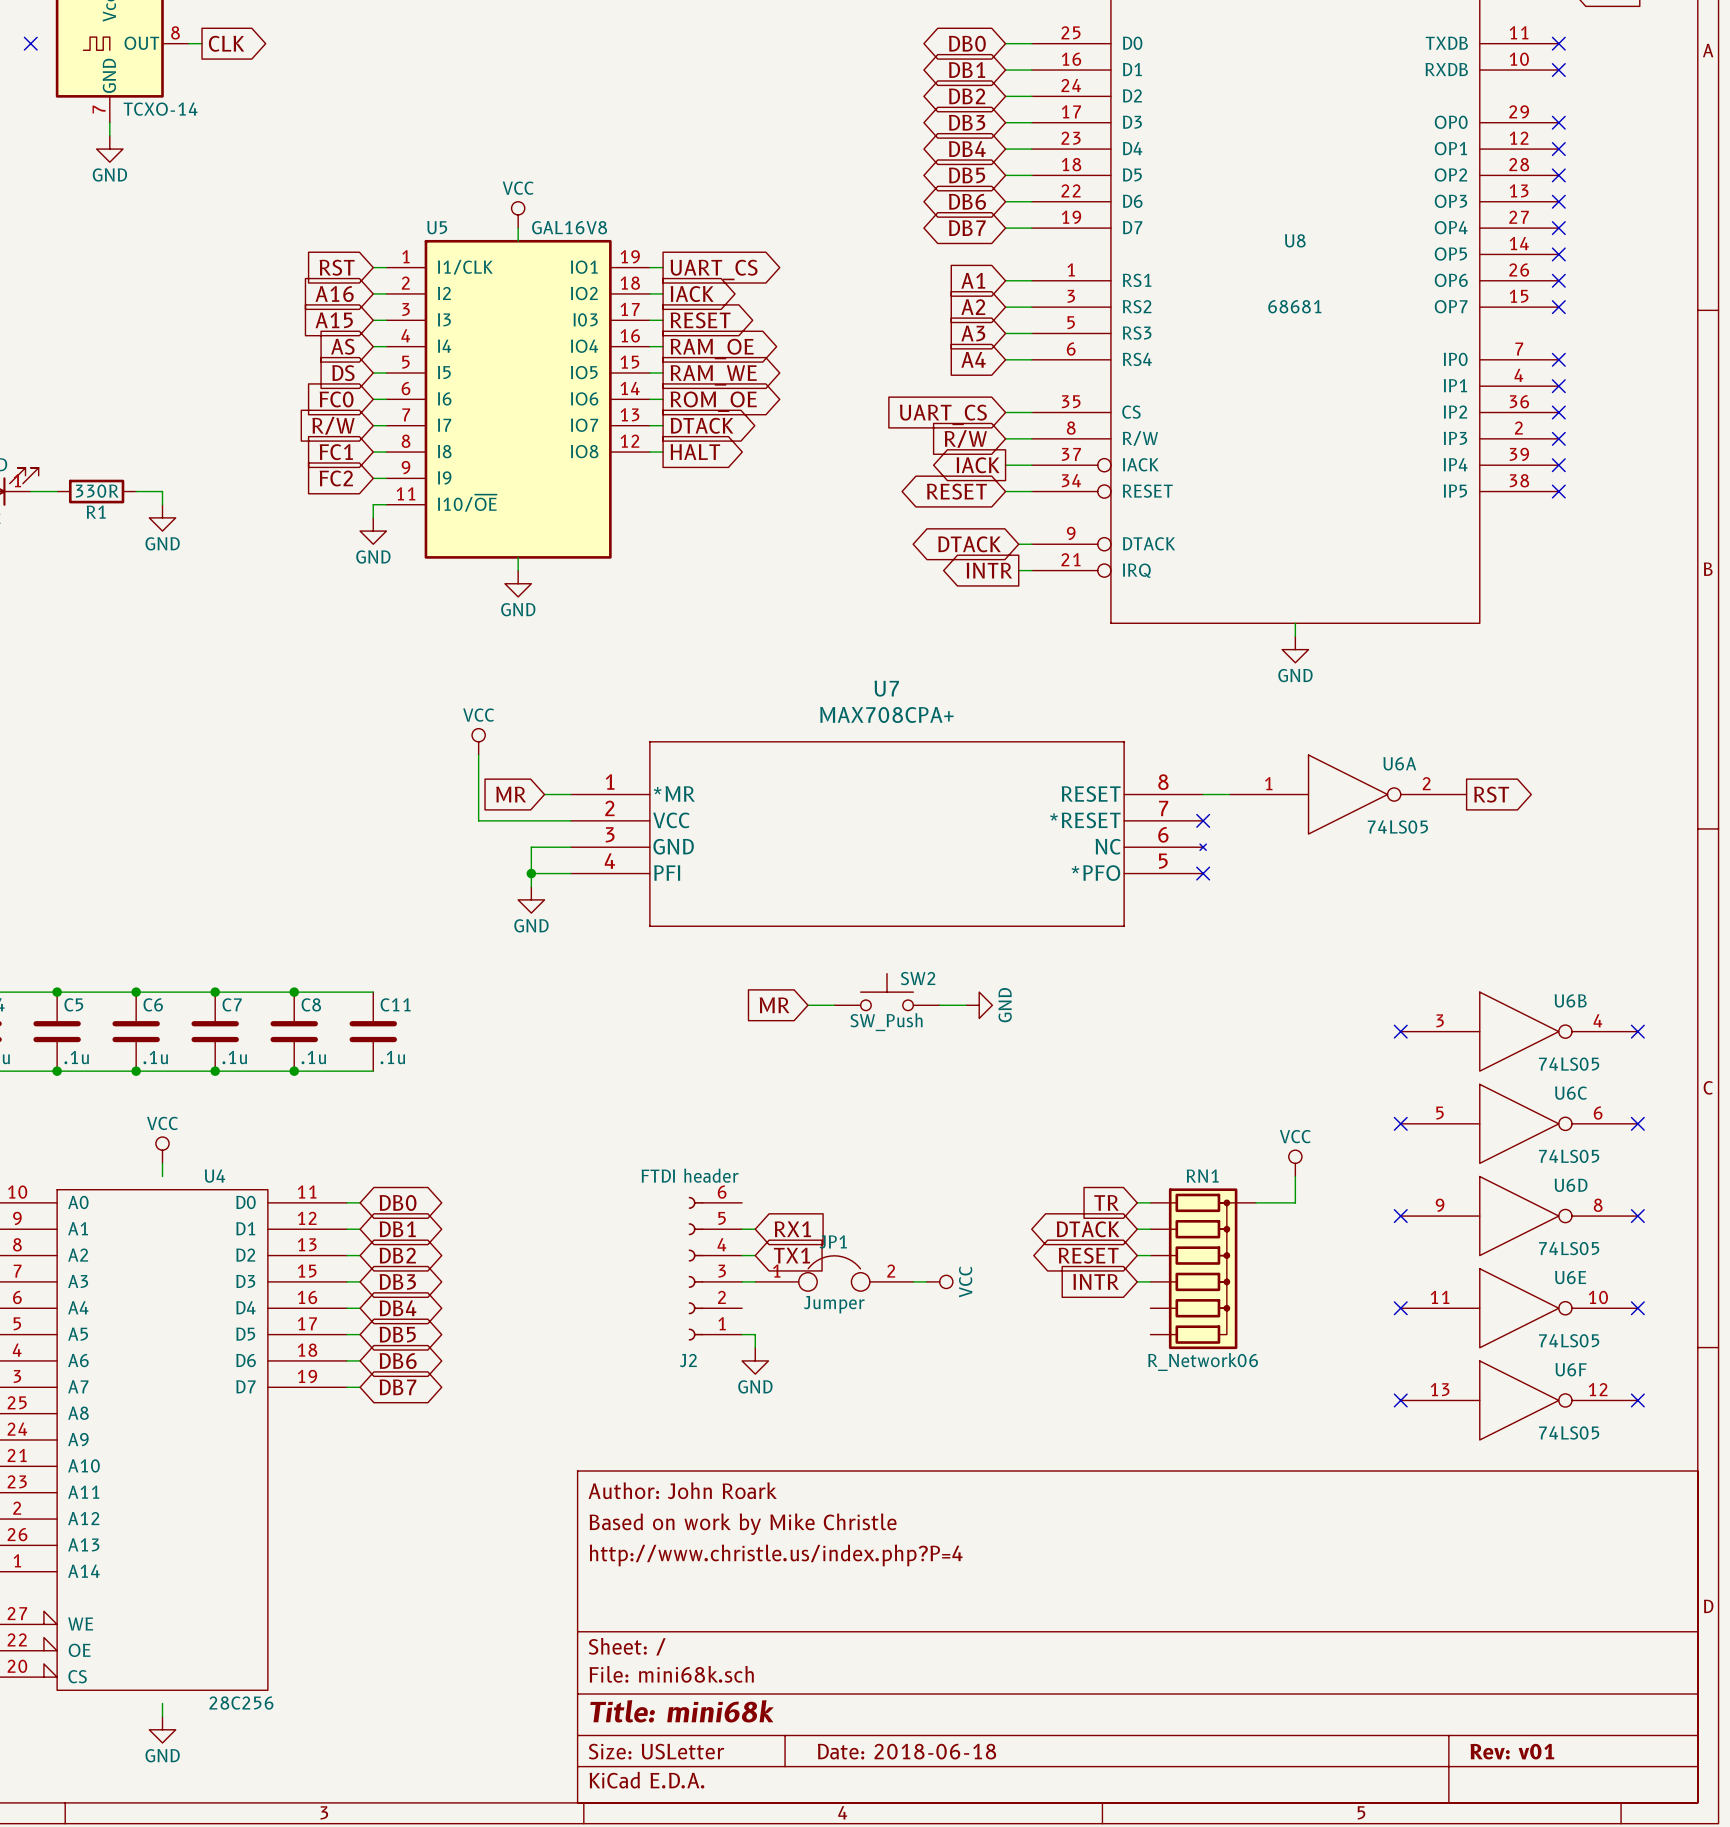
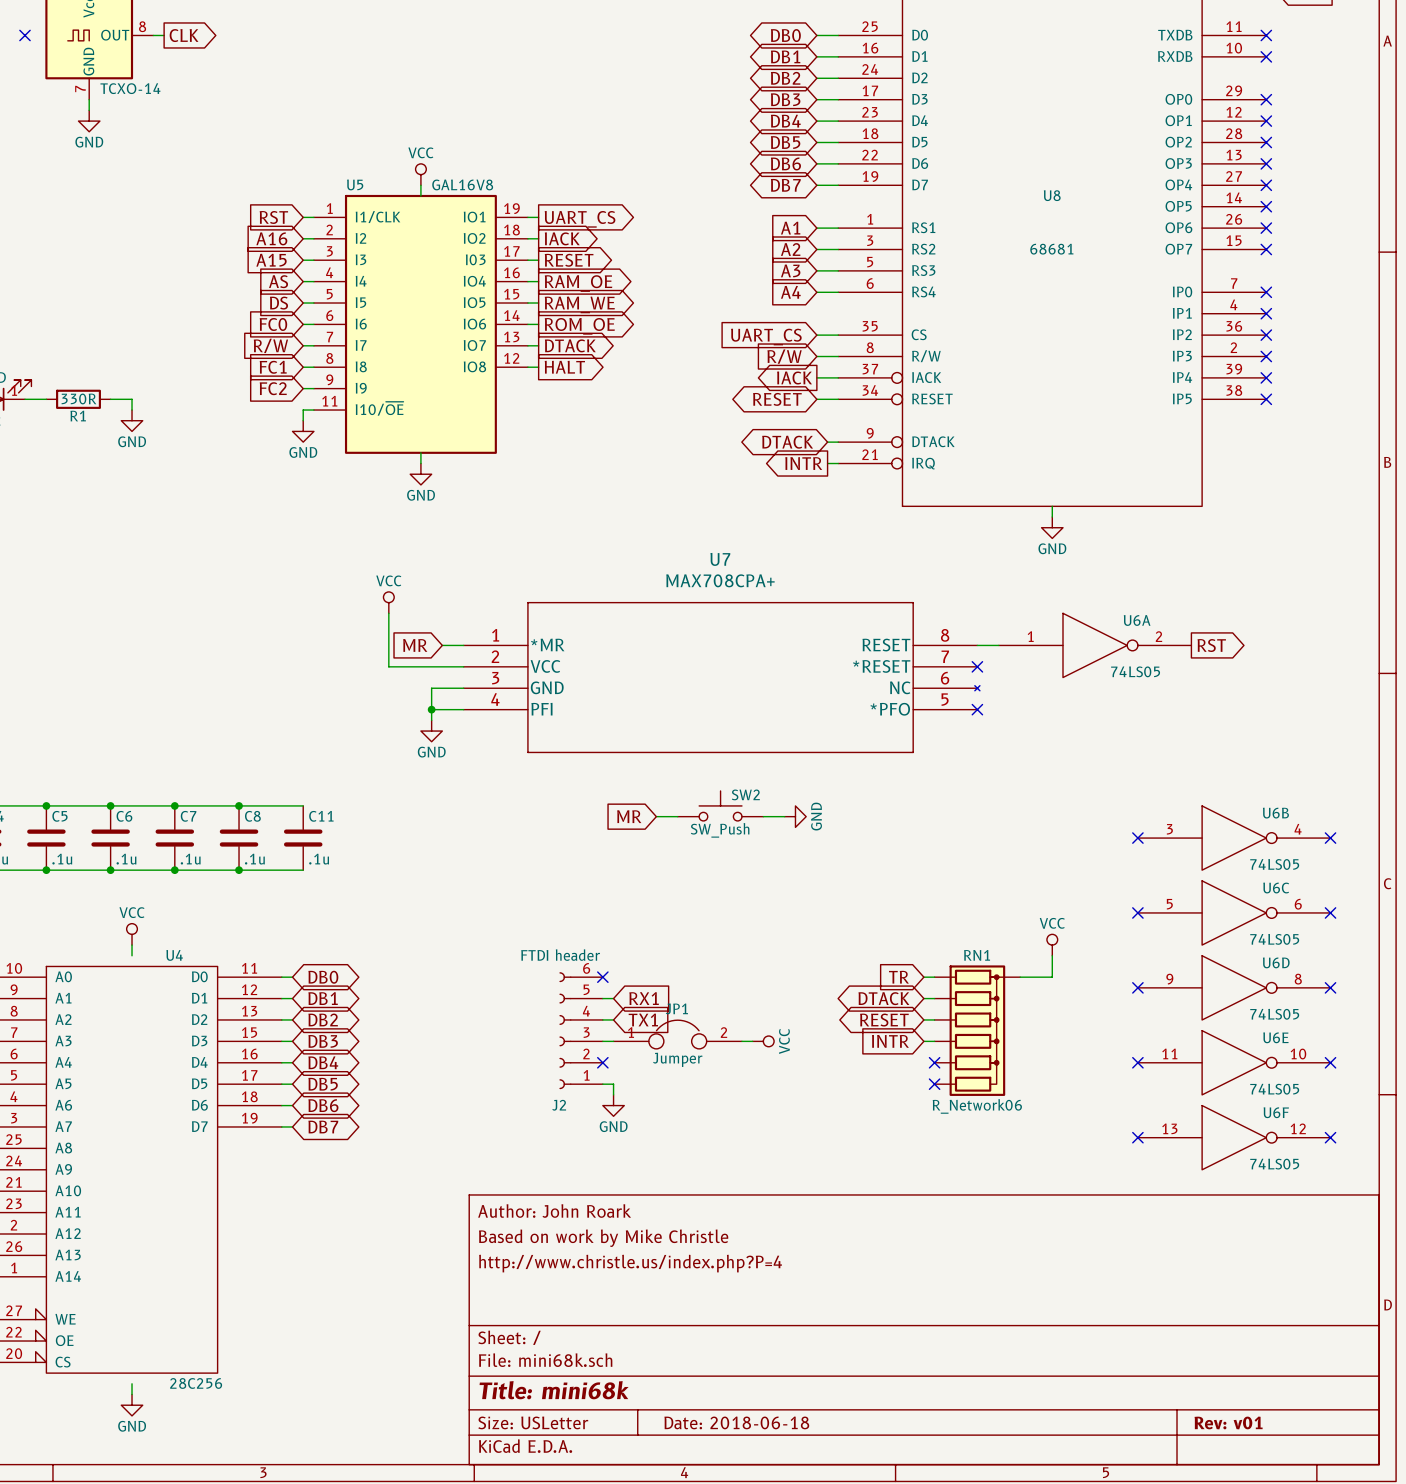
no-connect mark: none -> (602, 977)
no-connect mark: none -> (602, 1062)
no-connect mark: none -> (934, 1062)
no-connect mark: none -> (934, 1084)

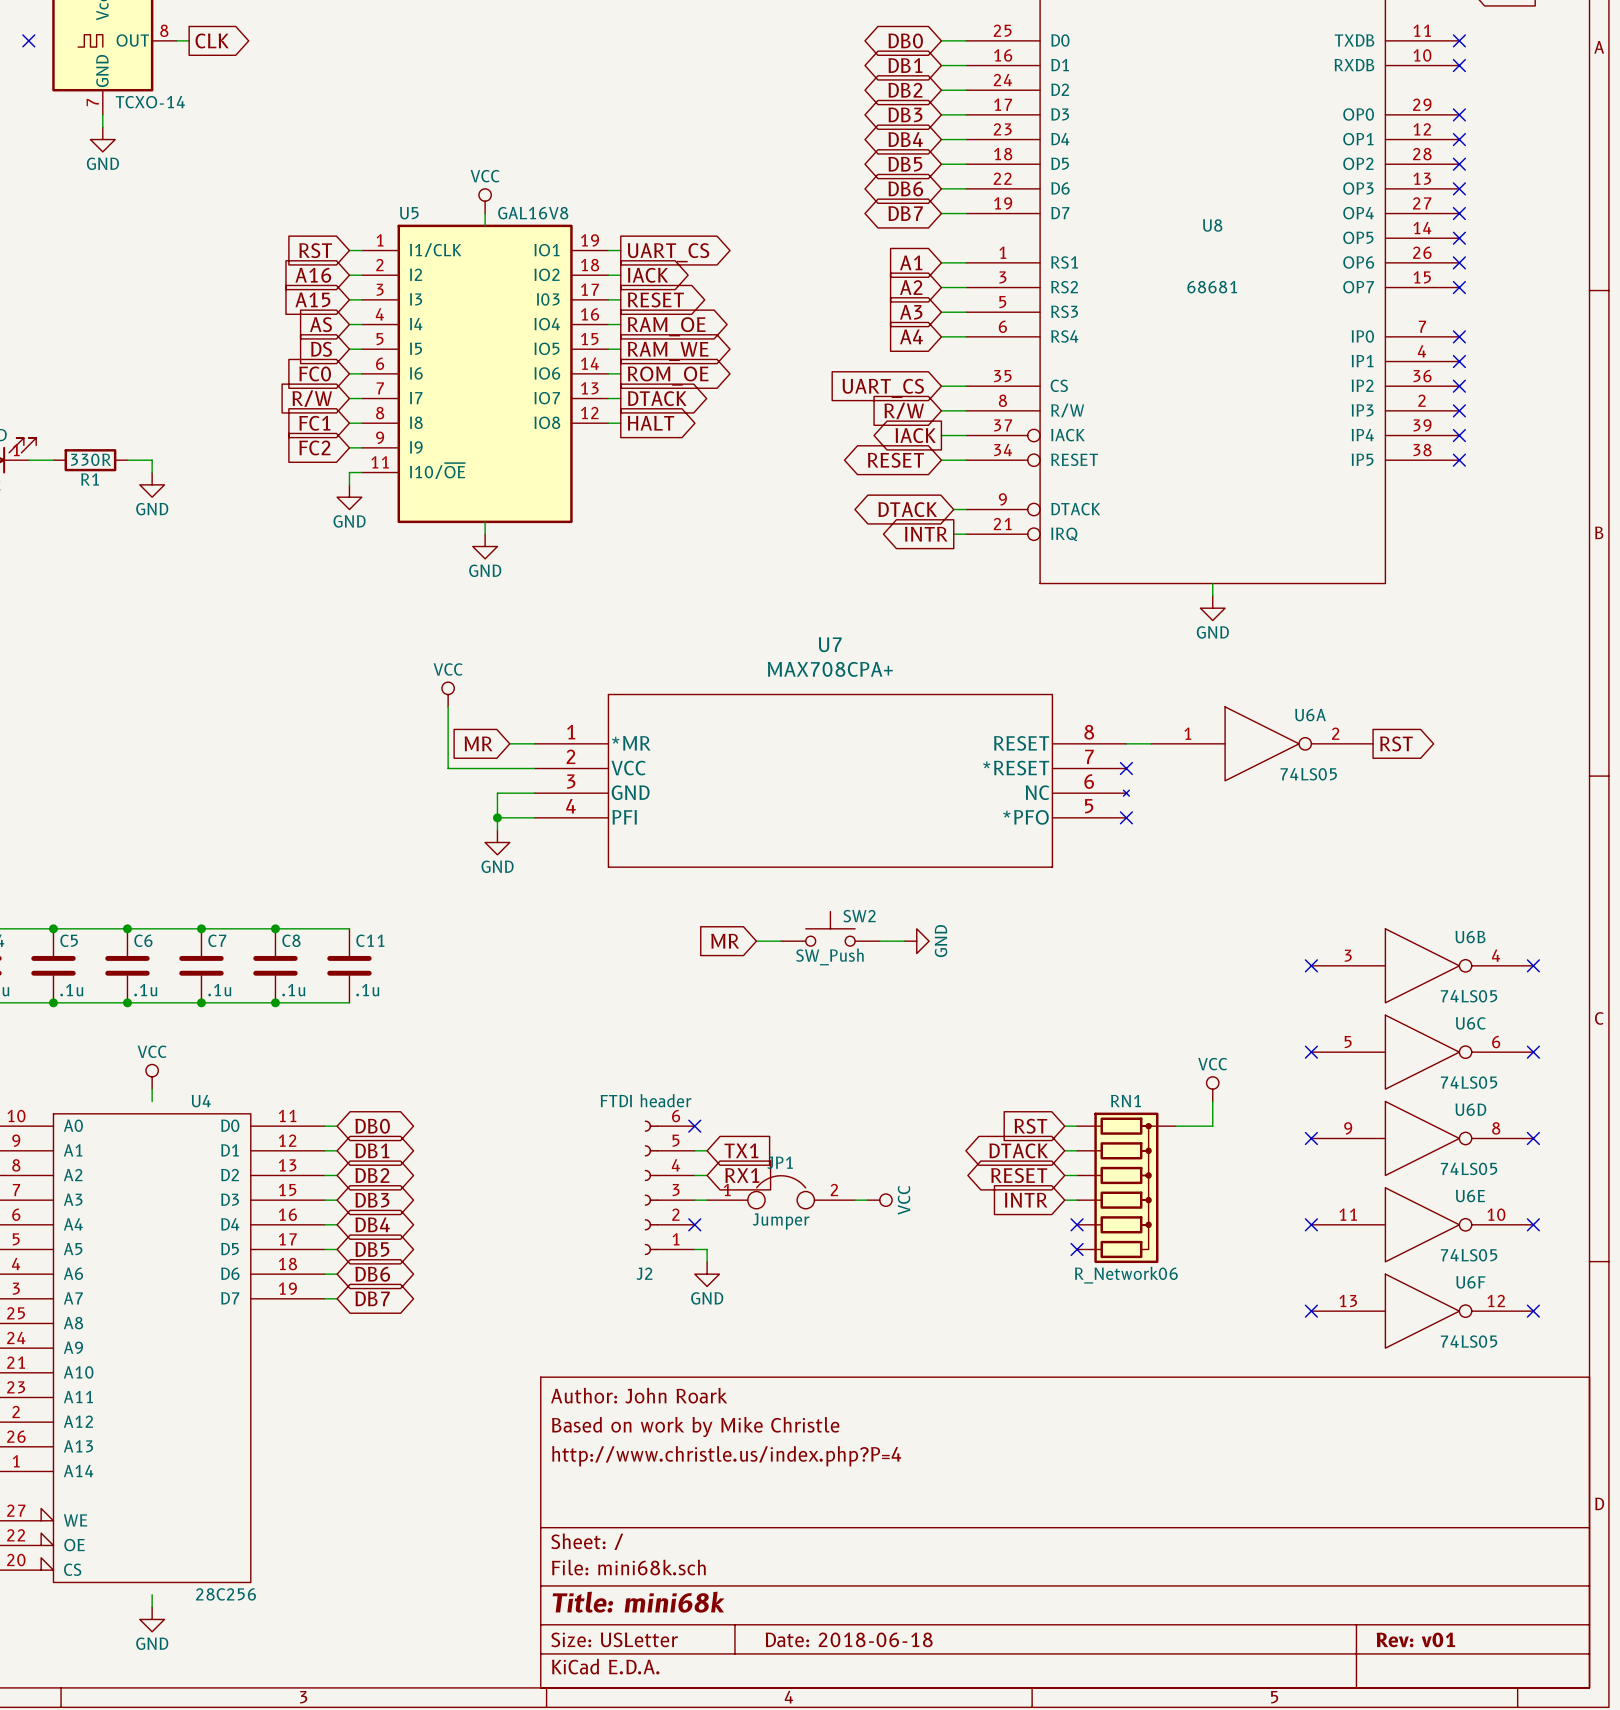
global label: TR (898, 977) -> RST (1030, 1126)
global label: RX1 (644, 998) -> TX1 (741, 1150)
global label: TX1 (643, 1019) -> RX1 (742, 1175)

